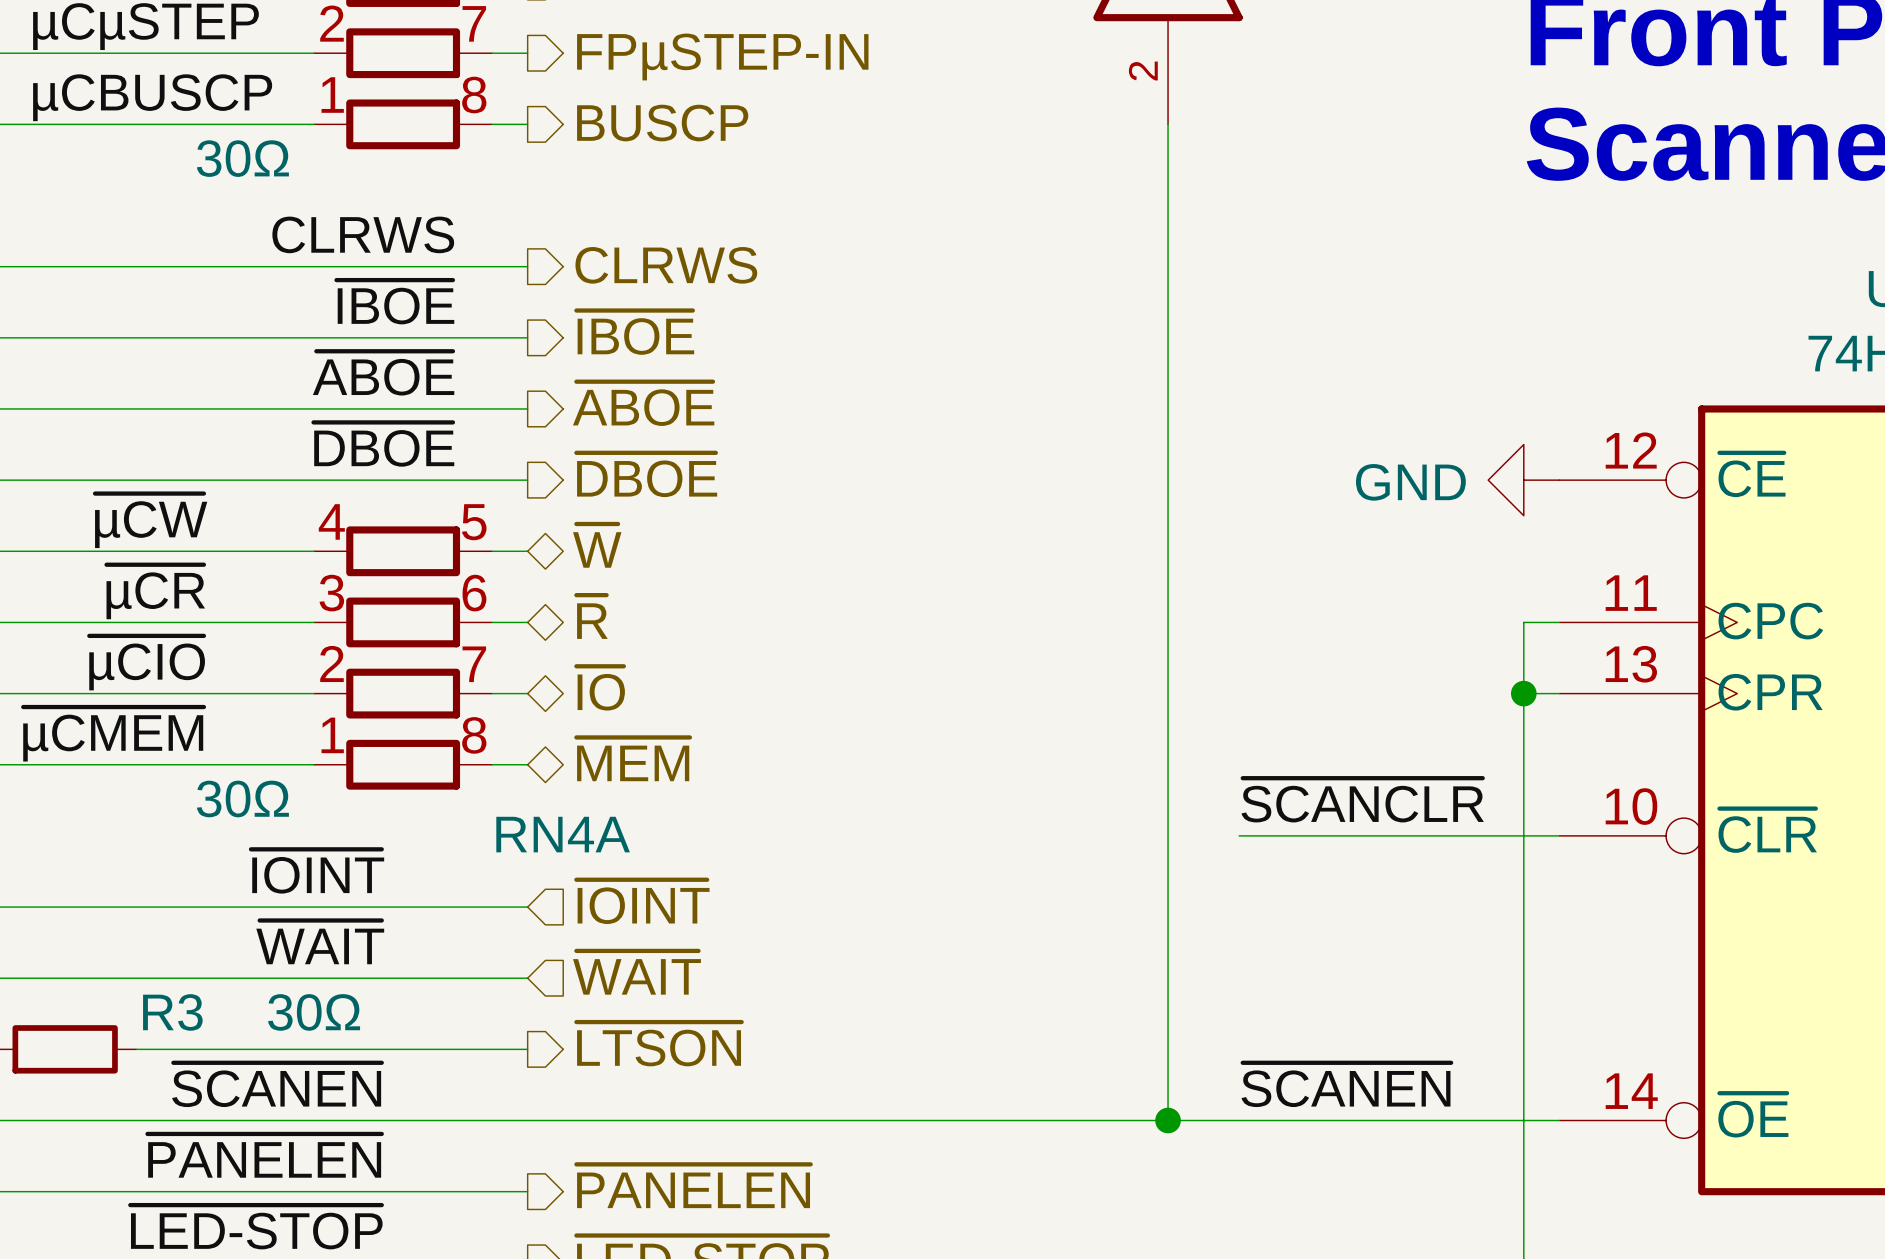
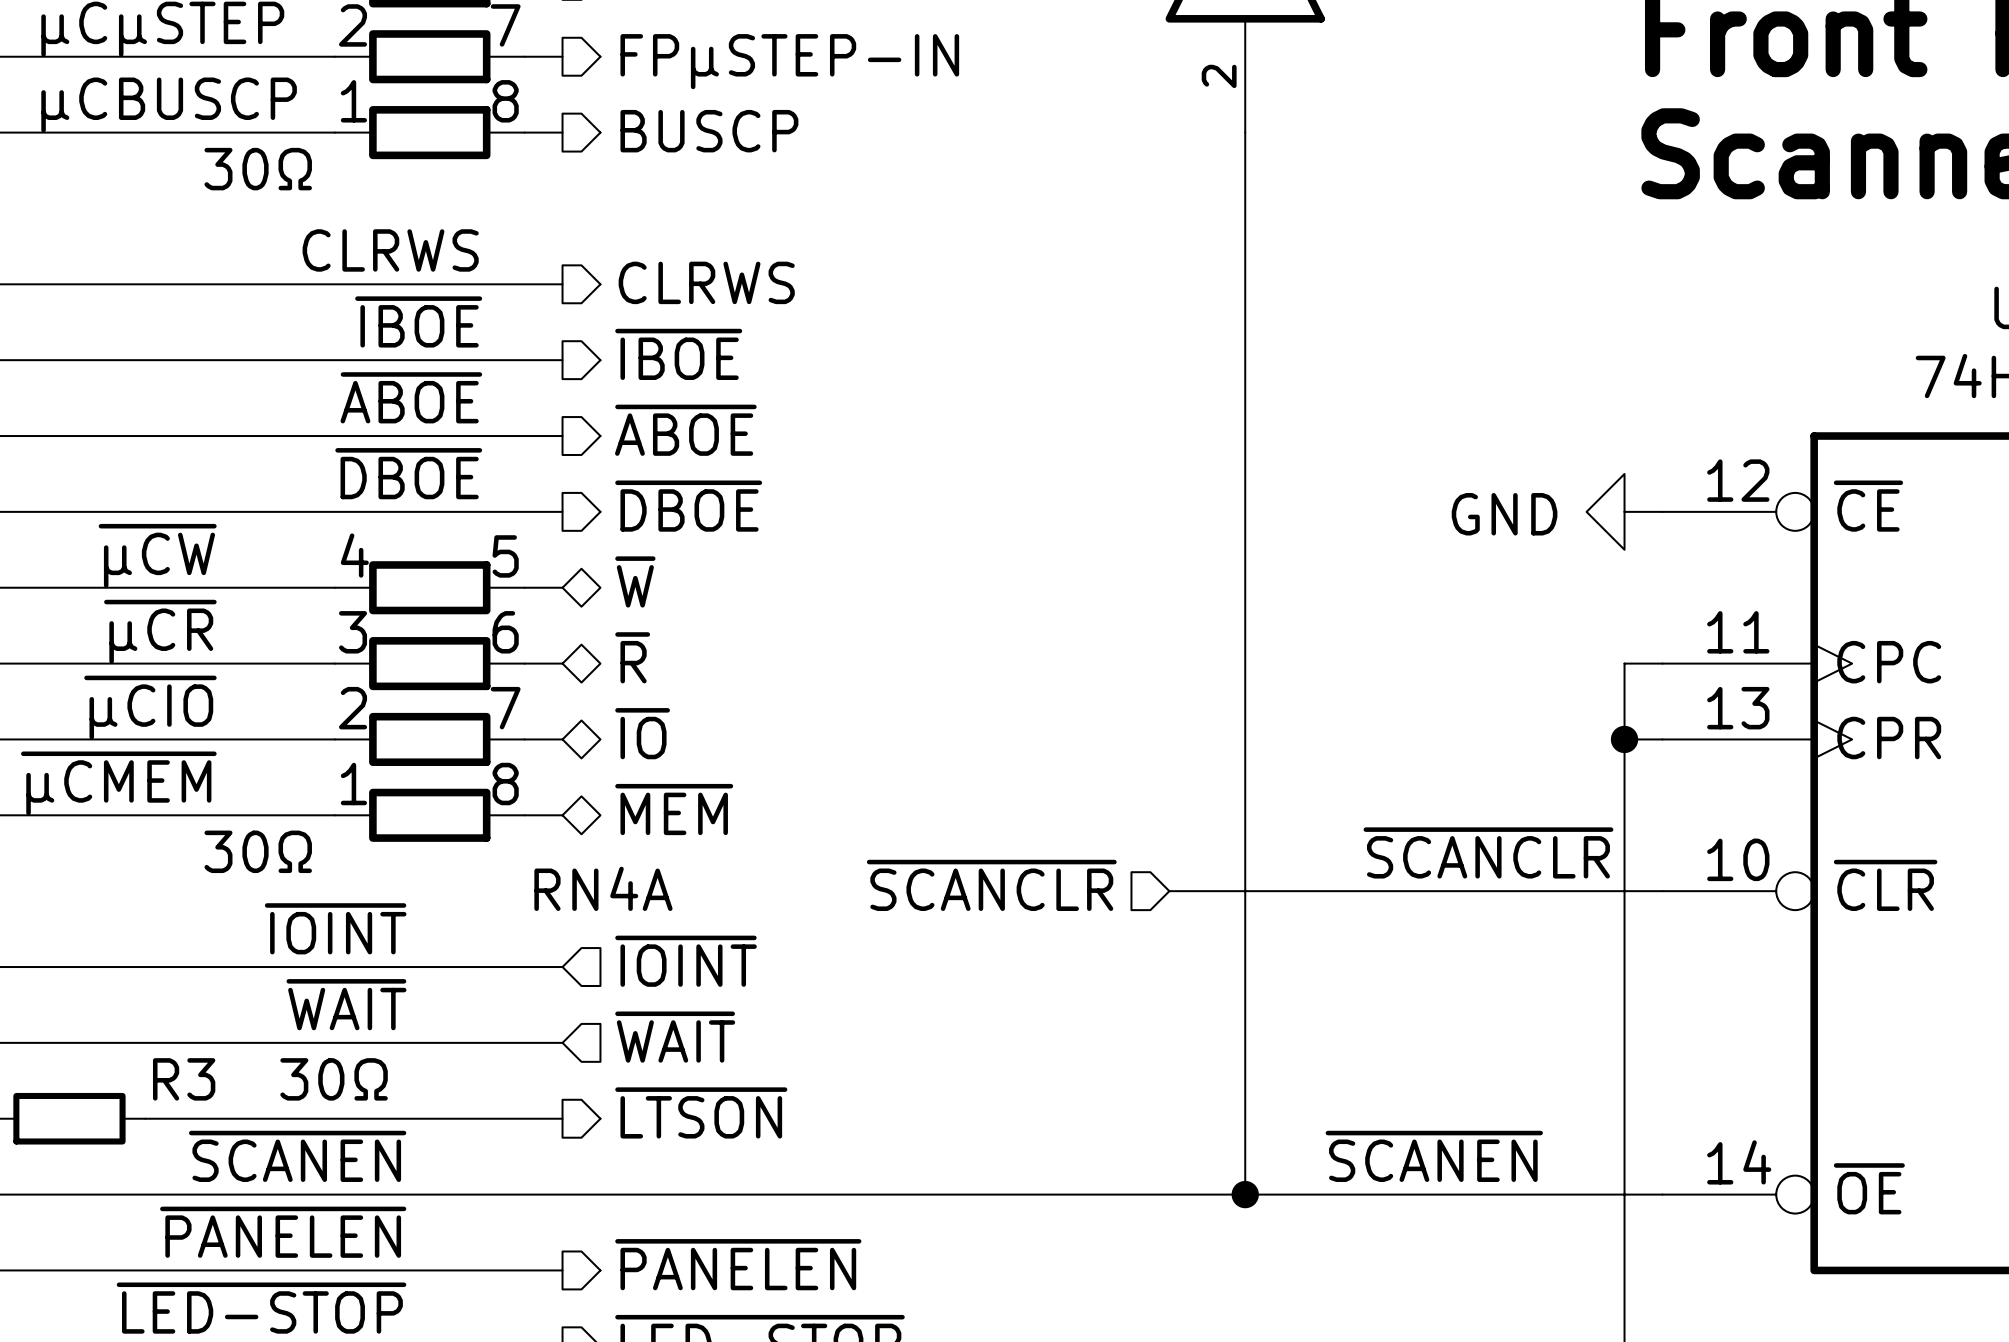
label position: ~{SCANCLR} (1362, 800) -> ~{SCANCLR} (1488, 852)
hierarchical label: none -> ~{SCANCLR} (991, 885)
wire: none -> (1169, 891) (1321, 891)

